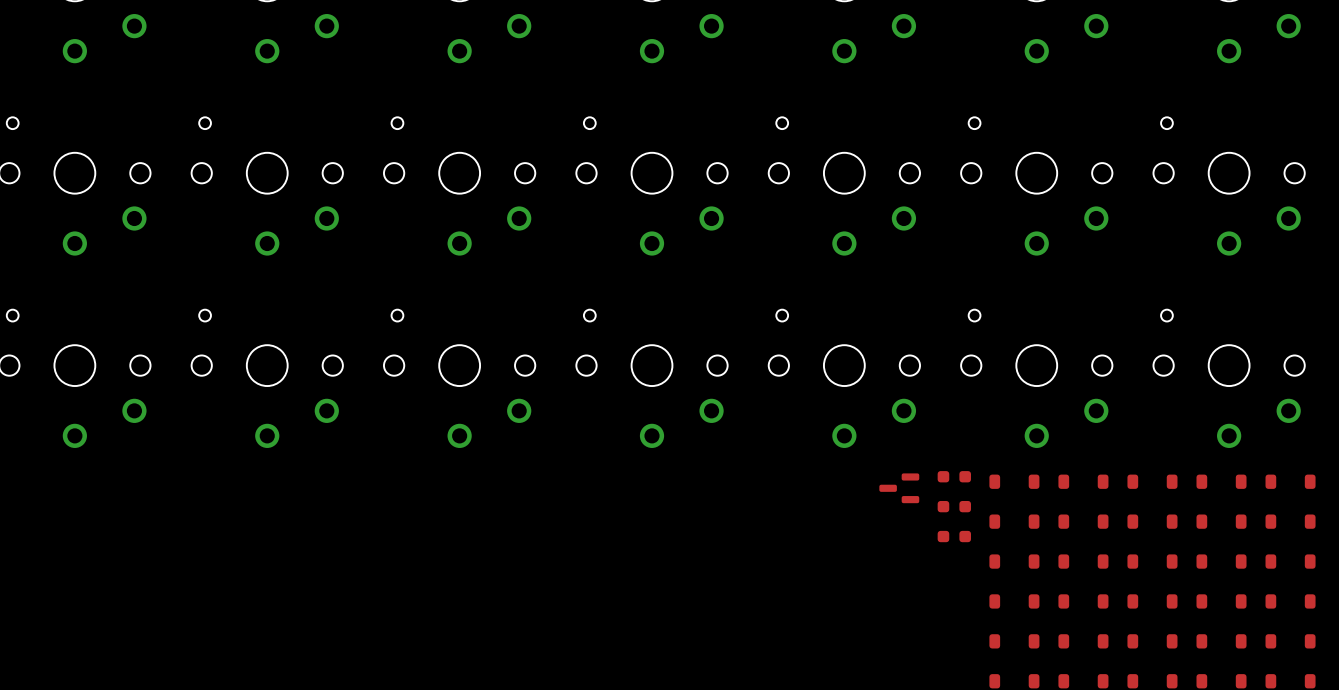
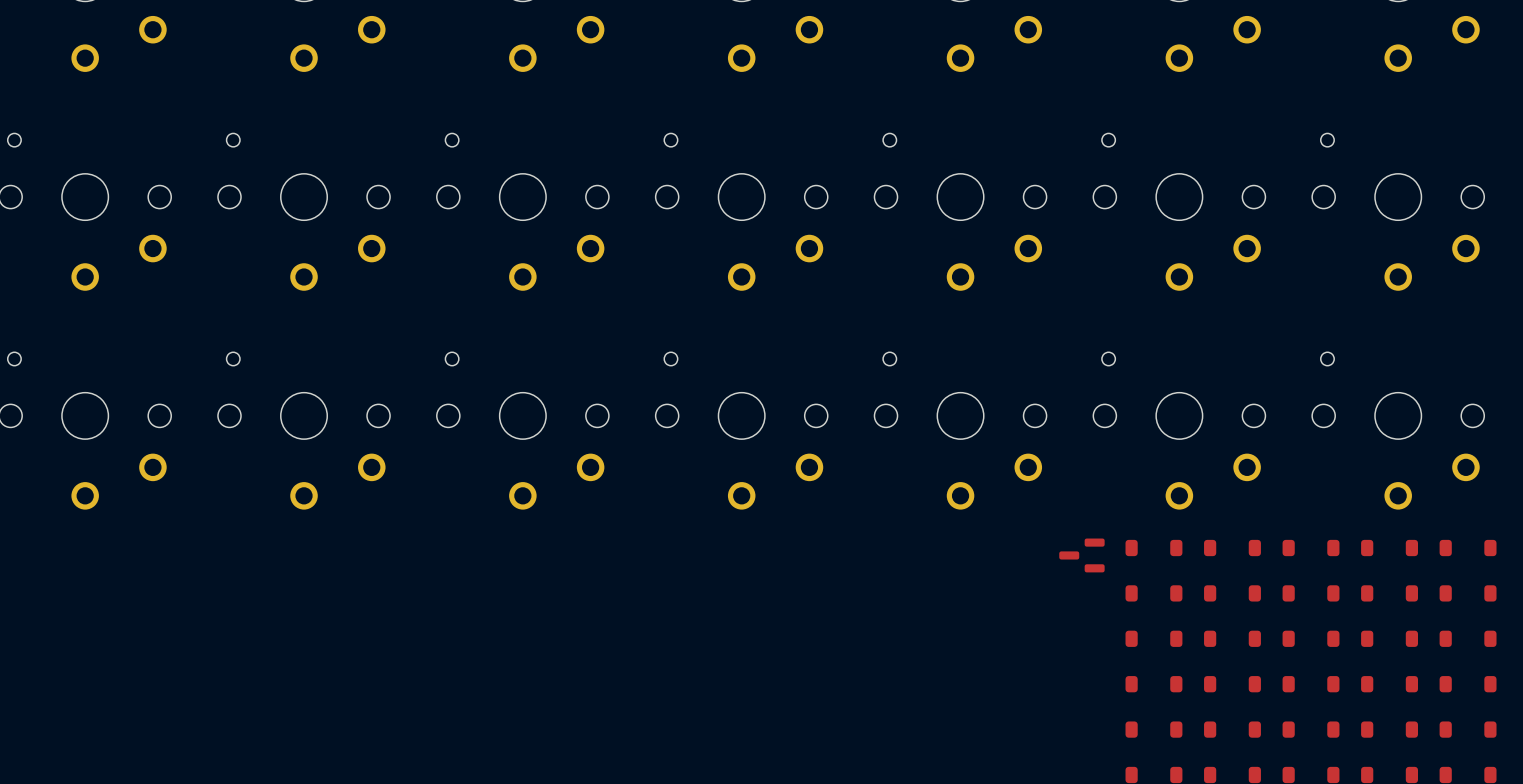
part: (954, 476) -> none
part position: (899, 488) -> (1081, 555)
part: (954, 506) -> none
part: (954, 536) -> none

